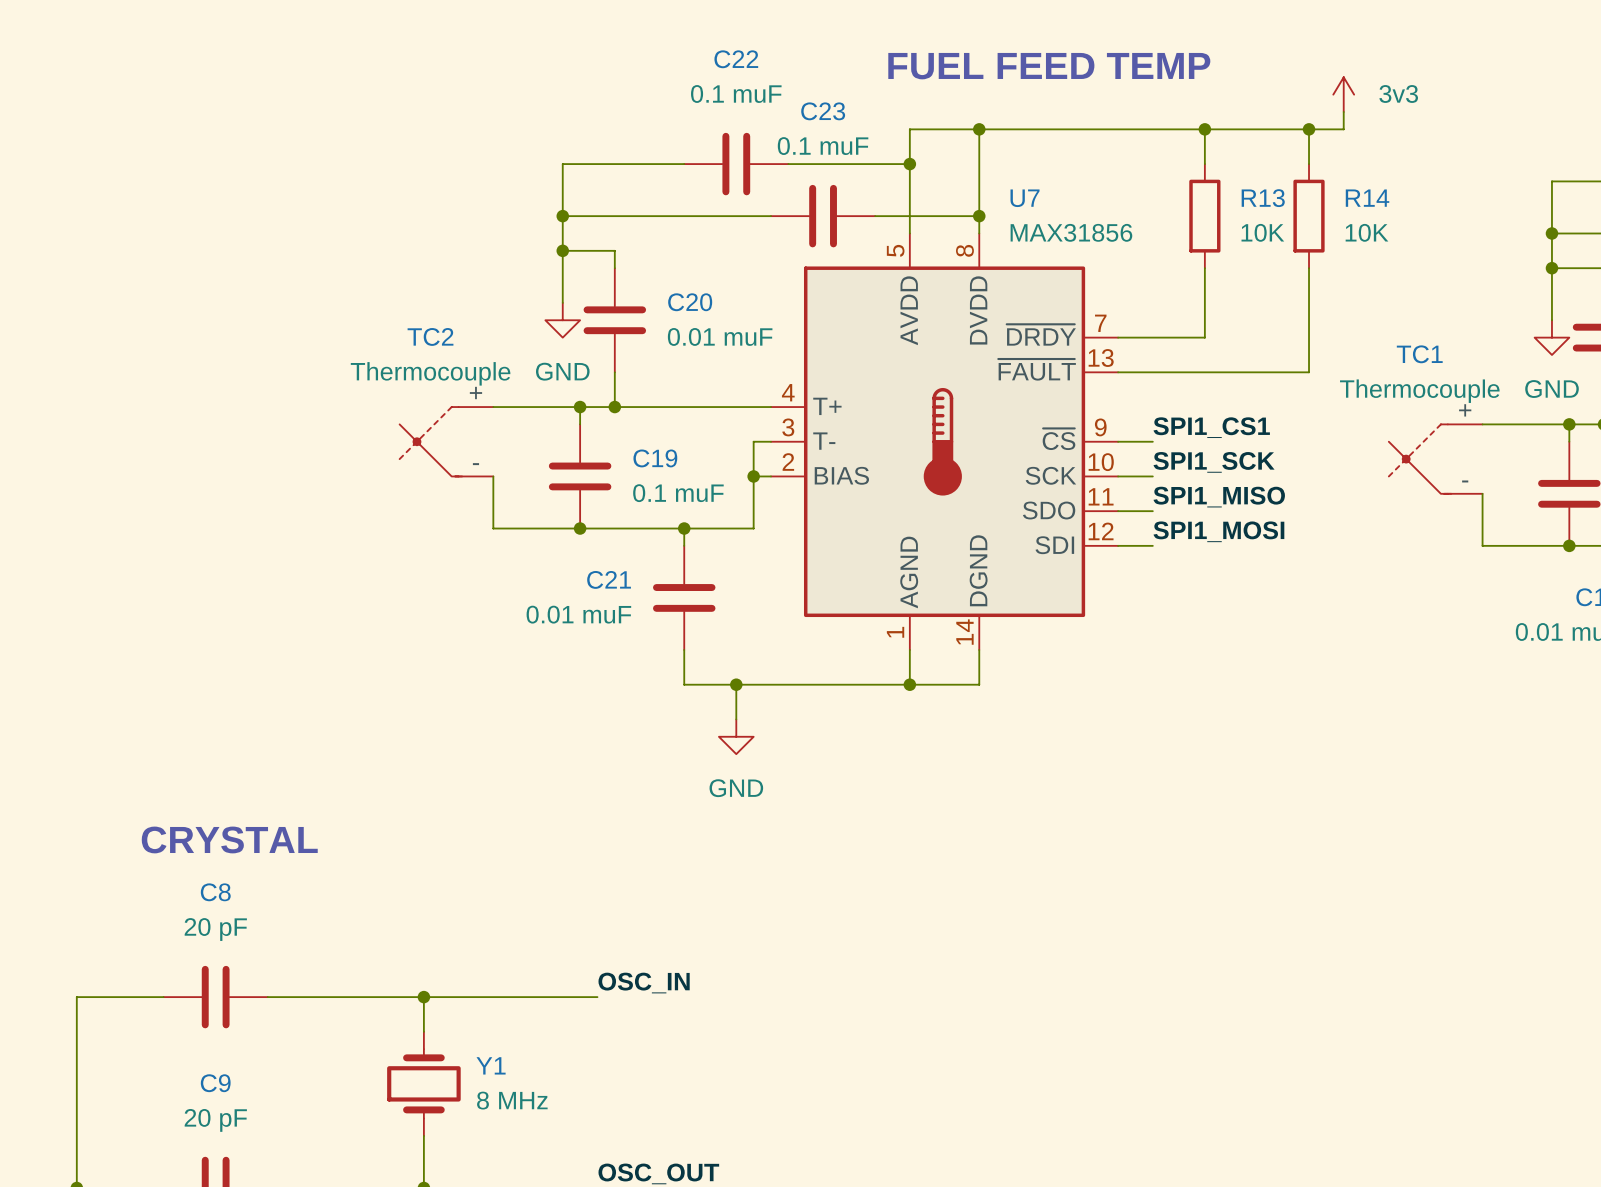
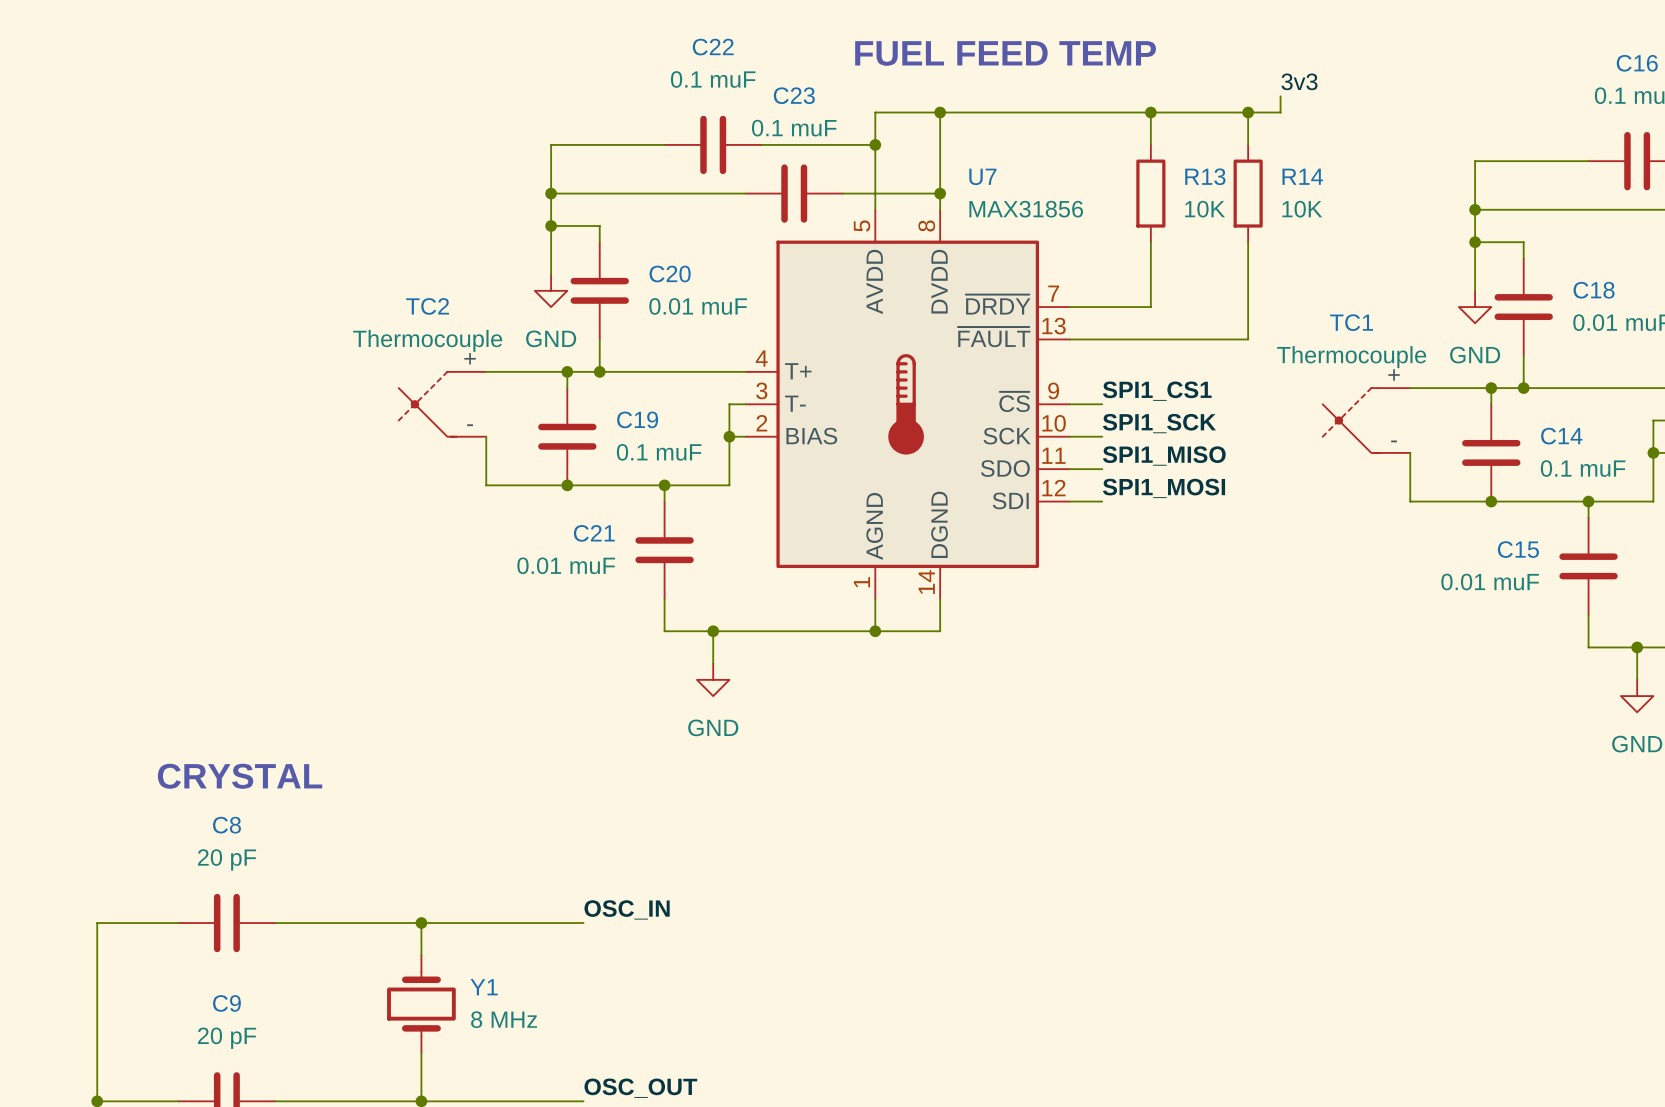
power symbol: 3v3 (1343, 94) -> none
label: none -> 3v3 (1299, 81)

